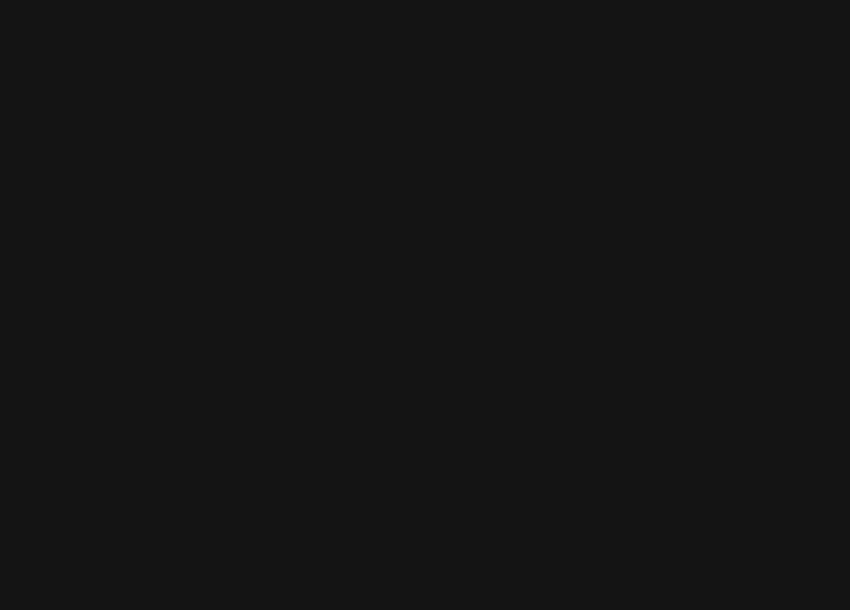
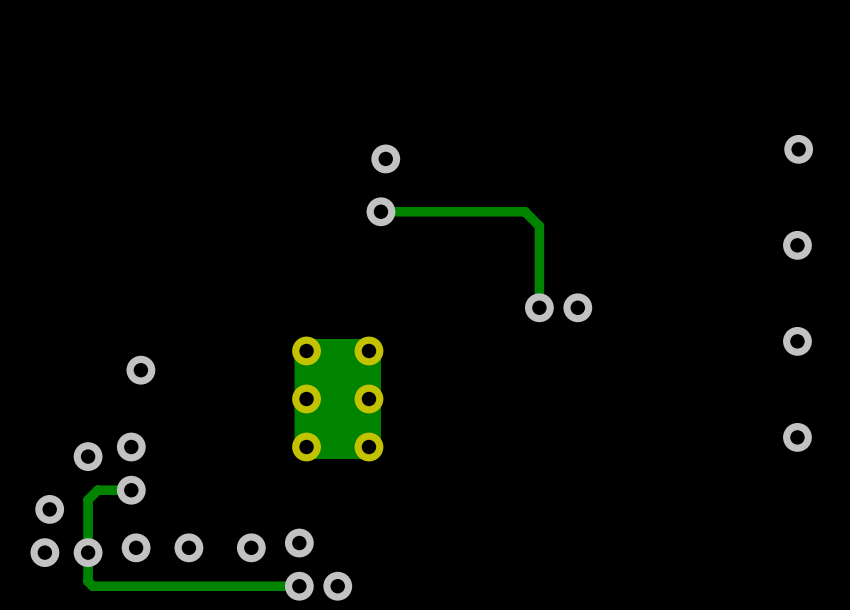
via: none -> (798, 149)
via: none -> (385, 158)
track: none -> (380, 211) (525, 211) (539, 226) (539, 307)
via: none -> (380, 211)
via: none -> (797, 245)
via: none -> (539, 307)
via: none -> (577, 307)
via: none -> (797, 341)
via: none -> (140, 370)
part: none -> (337, 398)
via: none -> (797, 437)
via: none -> (131, 447)
via: none -> (88, 456)
track: none -> (131, 490) (97, 490) (88, 499) (88, 581) (92, 586) (299, 586)
via: none -> (131, 490)
via: none -> (49, 509)
via: none -> (299, 543)
via: none -> (136, 547)
via: none -> (188, 547)
via: none -> (251, 547)
via: none -> (44, 552)
via: none -> (88, 552)
via: none -> (299, 586)
via: none -> (337, 586)

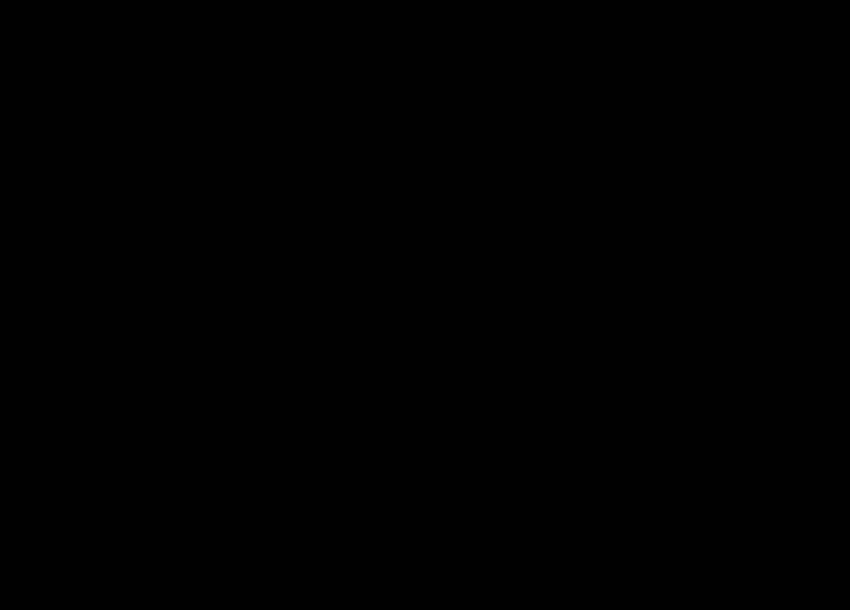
via: (798, 149) -> none
via: (385, 158) -> none
track: (380, 211) (525, 211) (539, 226) (539, 307) -> none
via: (380, 211) -> none
via: (797, 245) -> none
via: (539, 307) -> none
via: (577, 307) -> none
via: (797, 341) -> none
via: (140, 370) -> none
part: (337, 398) -> none
via: (797, 437) -> none
via: (131, 447) -> none
via: (88, 456) -> none
track: (131, 490) (97, 490) (88, 499) (88, 581) (92, 586) (299, 586) -> none
via: (131, 490) -> none
via: (49, 509) -> none
via: (299, 543) -> none
via: (136, 547) -> none
via: (188, 547) -> none
via: (251, 547) -> none
via: (44, 552) -> none
via: (88, 552) -> none
via: (299, 586) -> none
via: (337, 586) -> none

